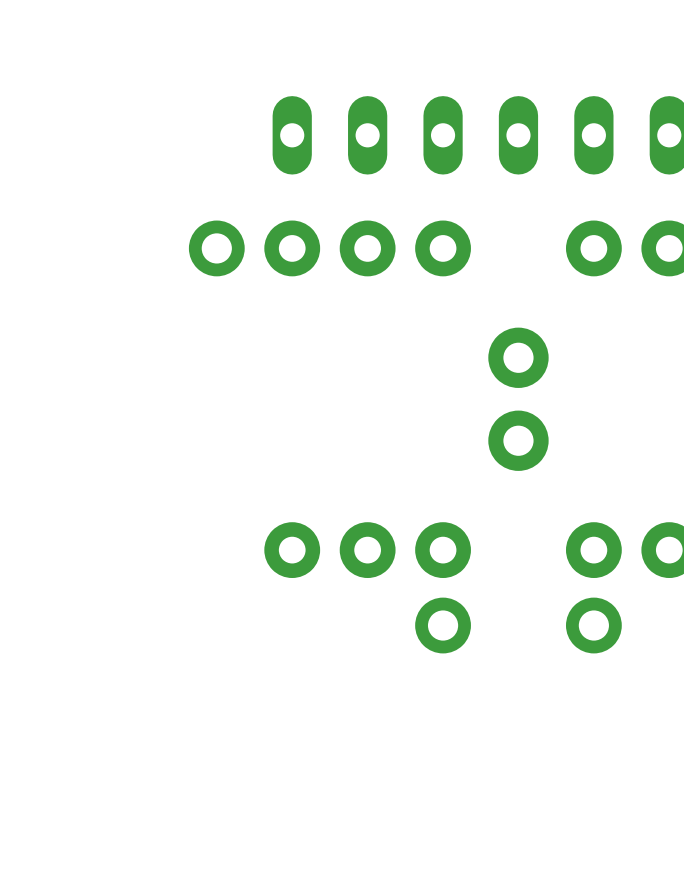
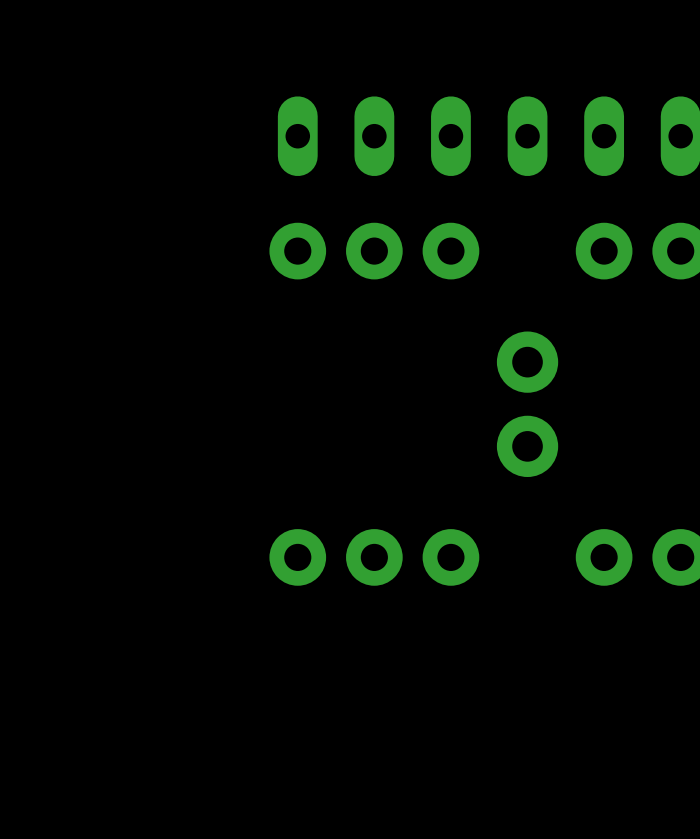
part: (216, 248) -> none
part: (443, 625) -> none
part: (593, 625) -> none

